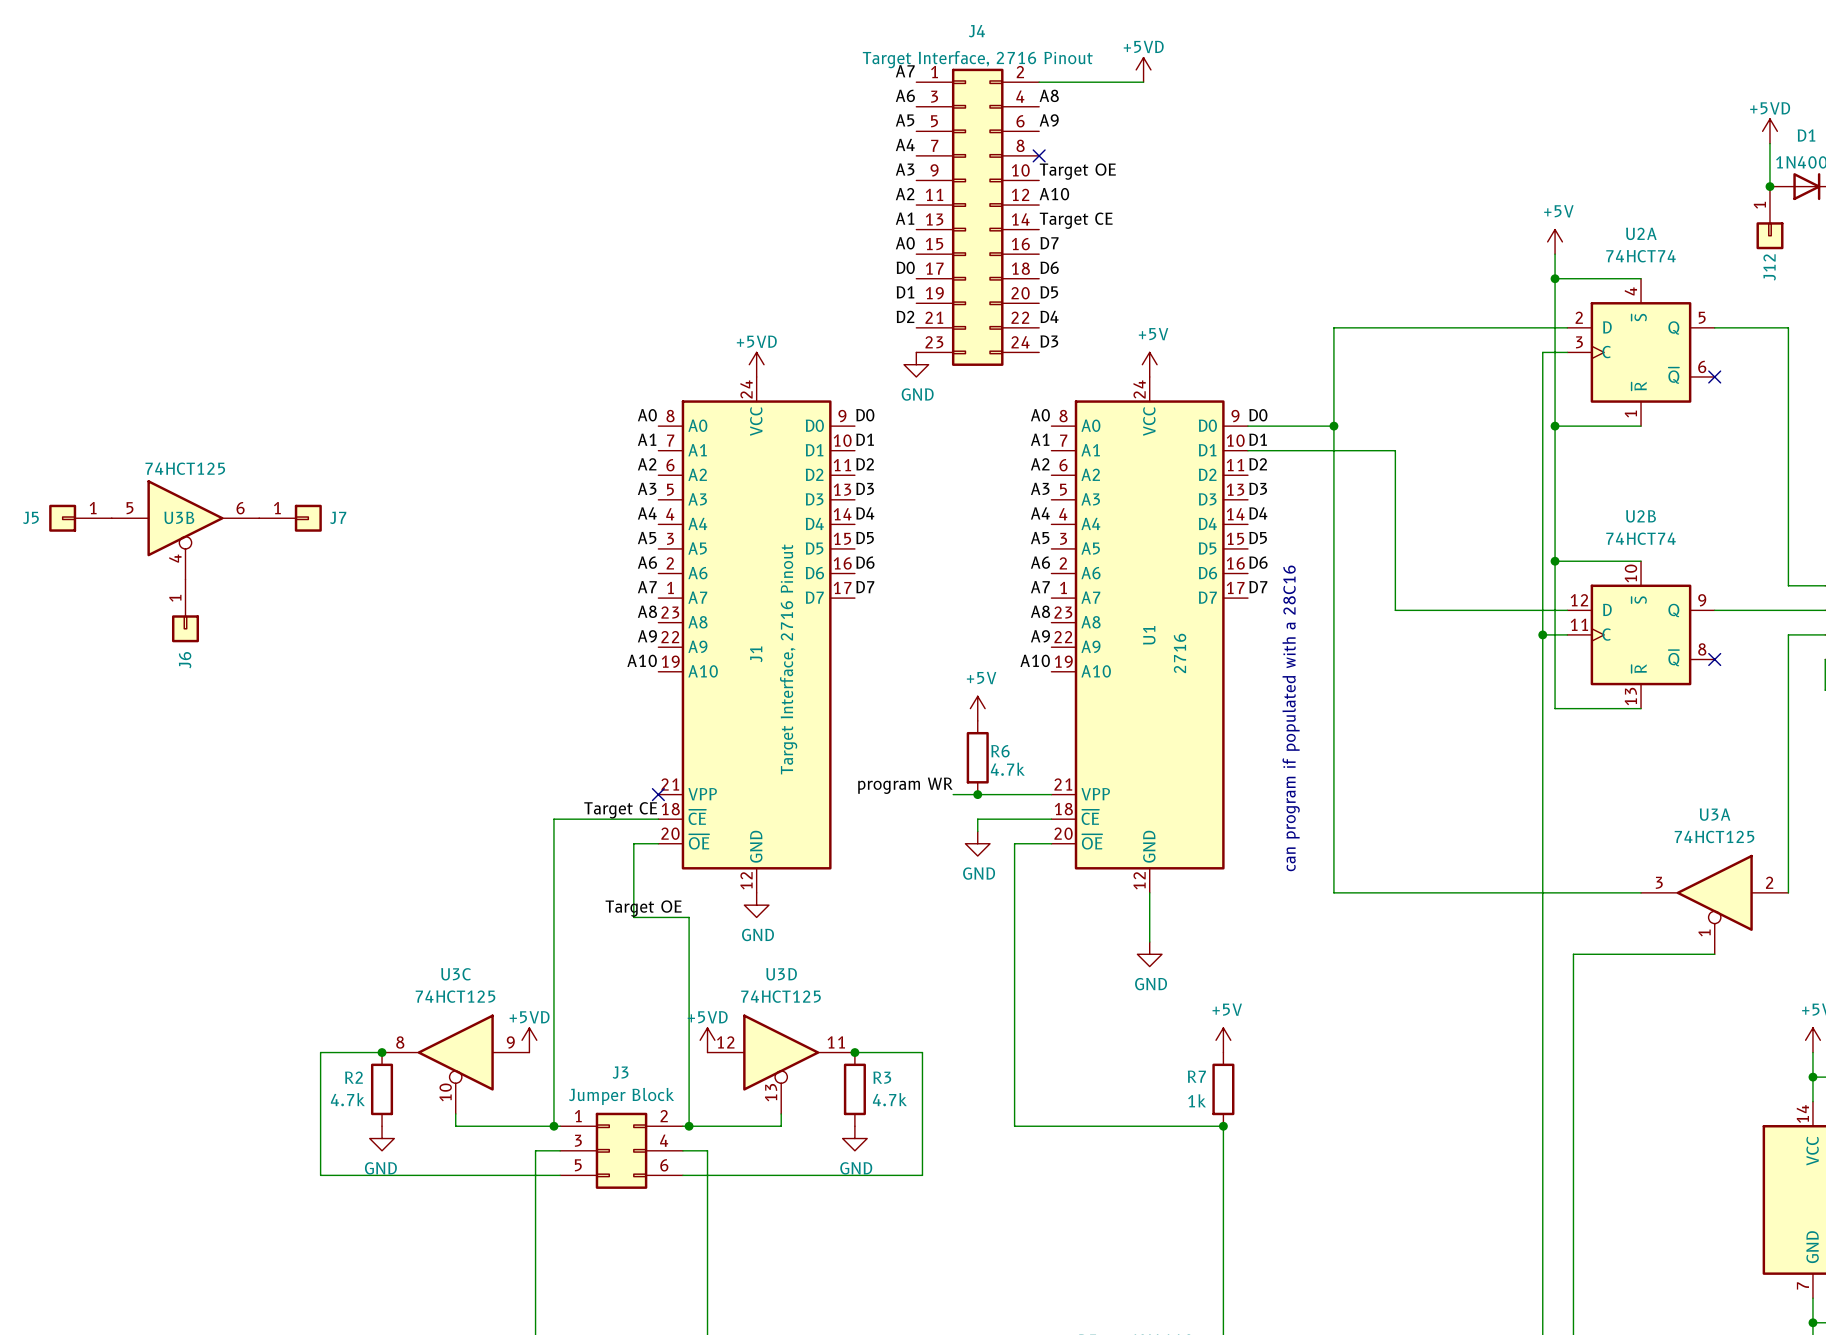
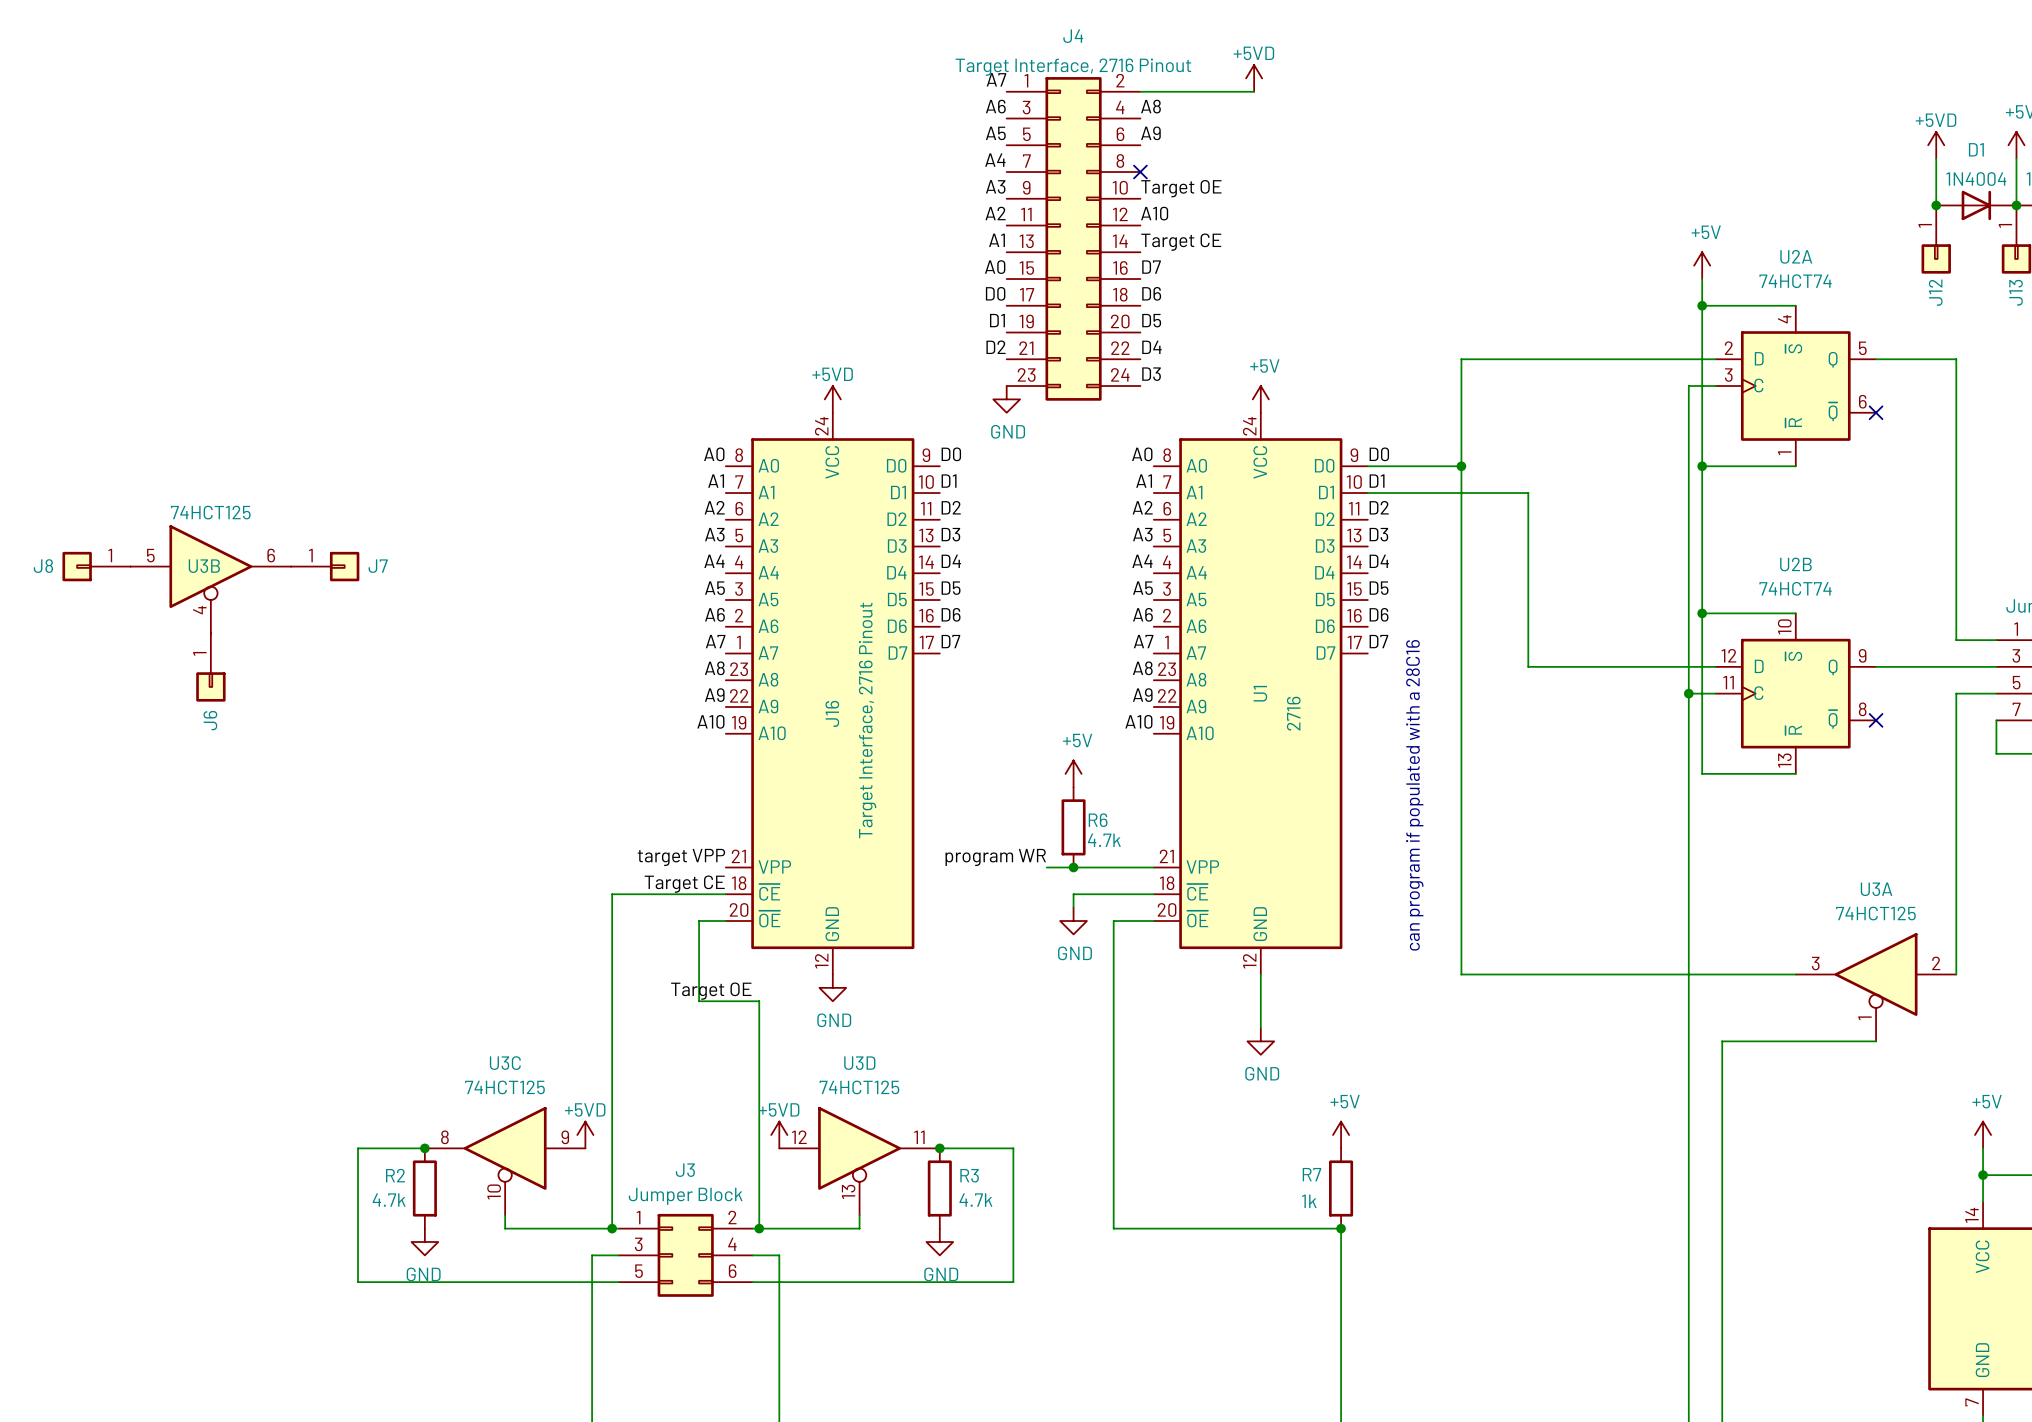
J5 name: J5 (30, 517) -> J8 (43, 566)
J1 name: J1 (756, 654) -> J16 (832, 713)
label: none -> target VPP (681, 857)
no-connect mark: (658, 794) -> none

